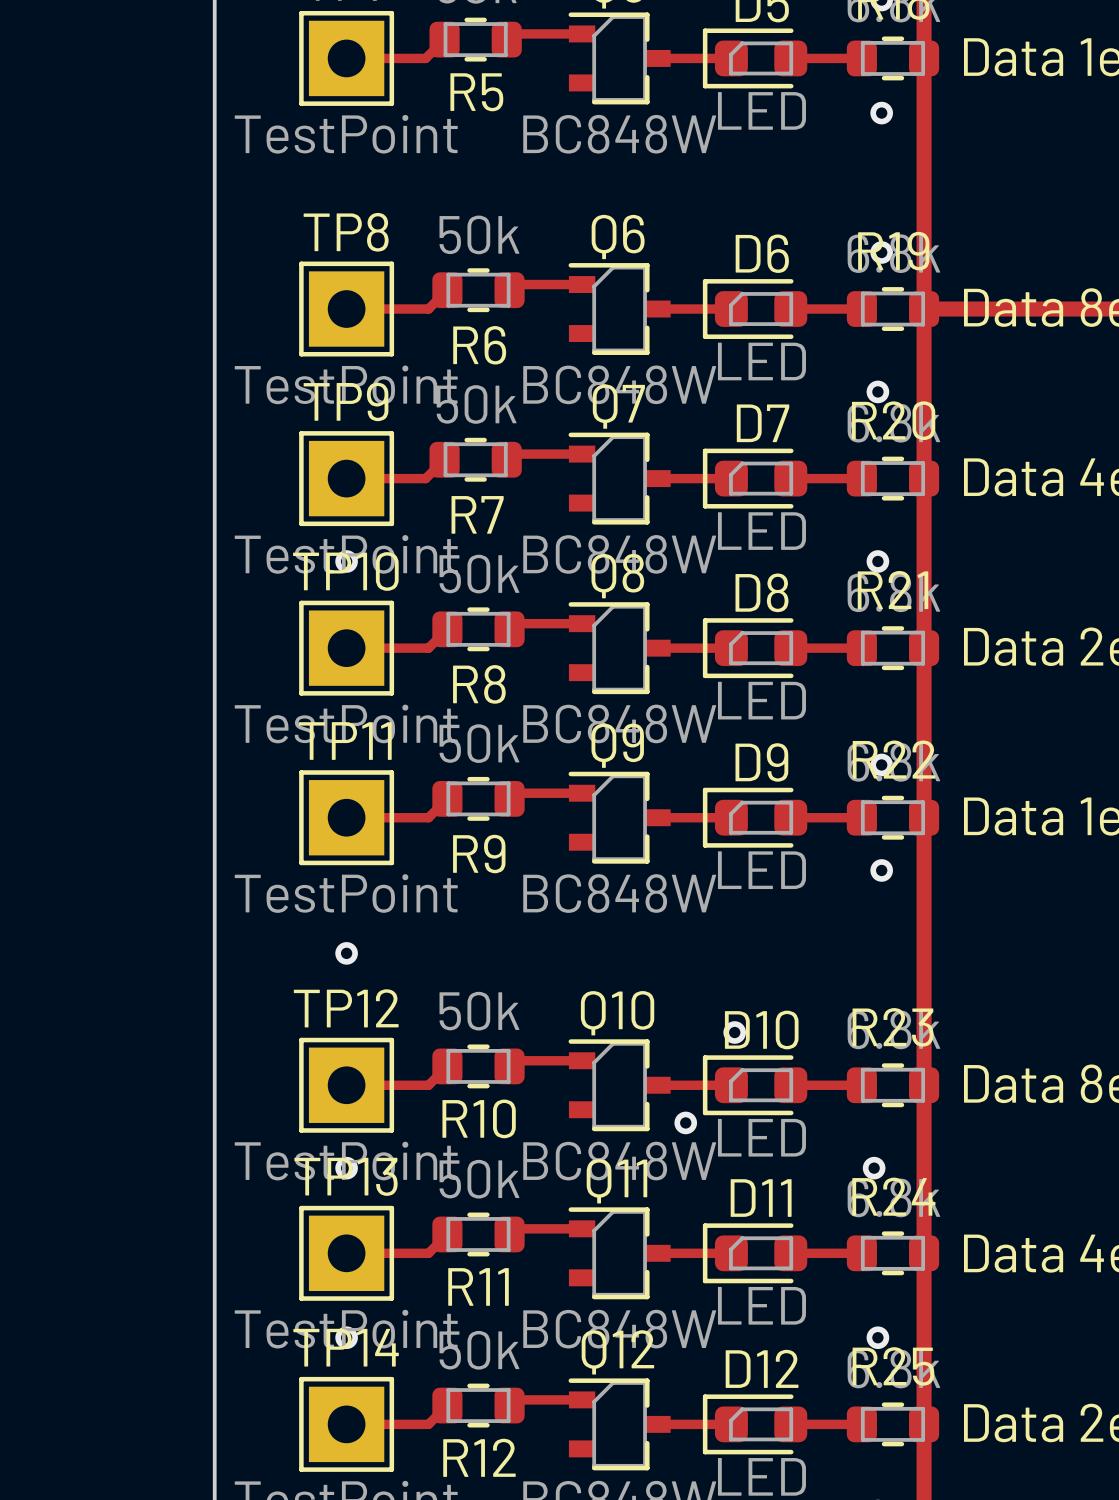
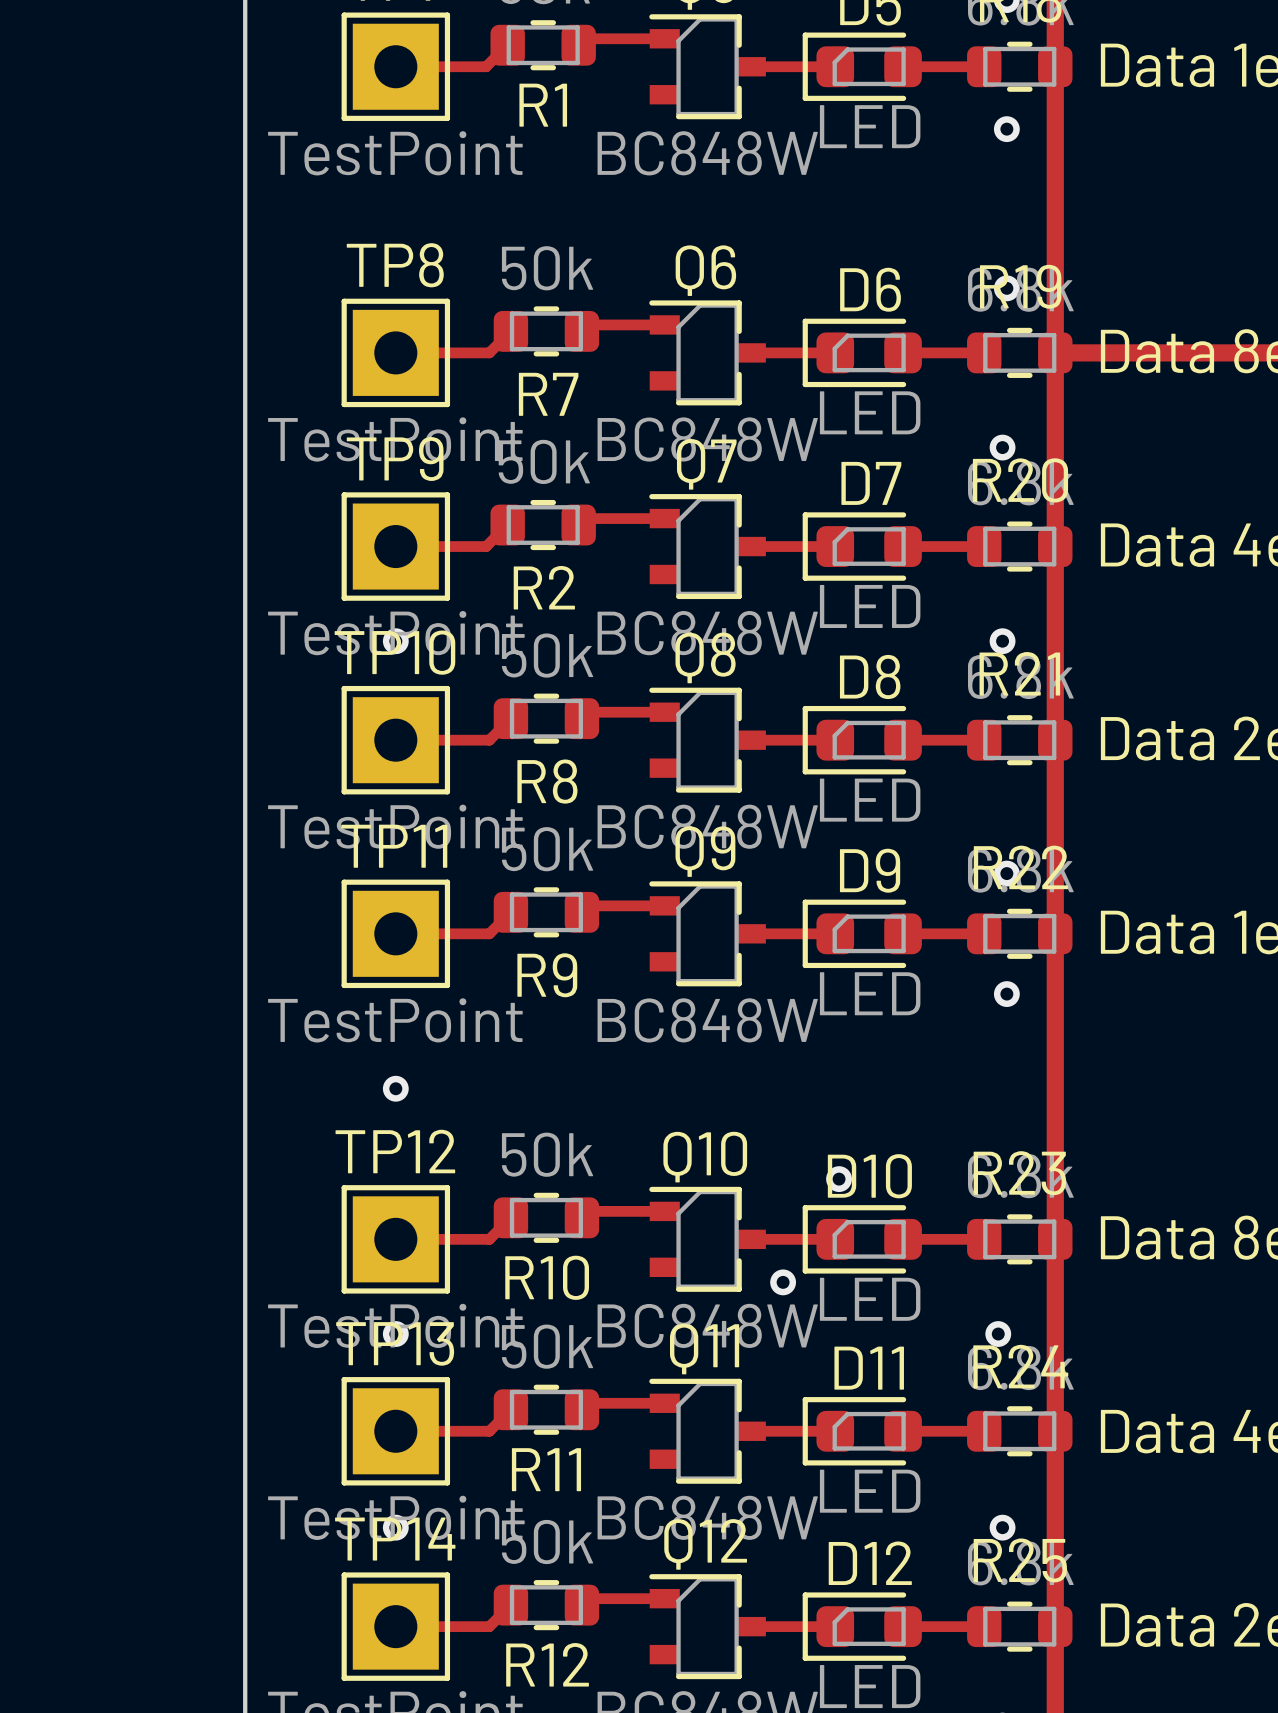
R5 name: R5 (476, 92) -> R1 (543, 105)
R6 name: R6 (479, 345) -> R7 (548, 394)
R7 name: R7 (477, 514) -> R2 (544, 587)

